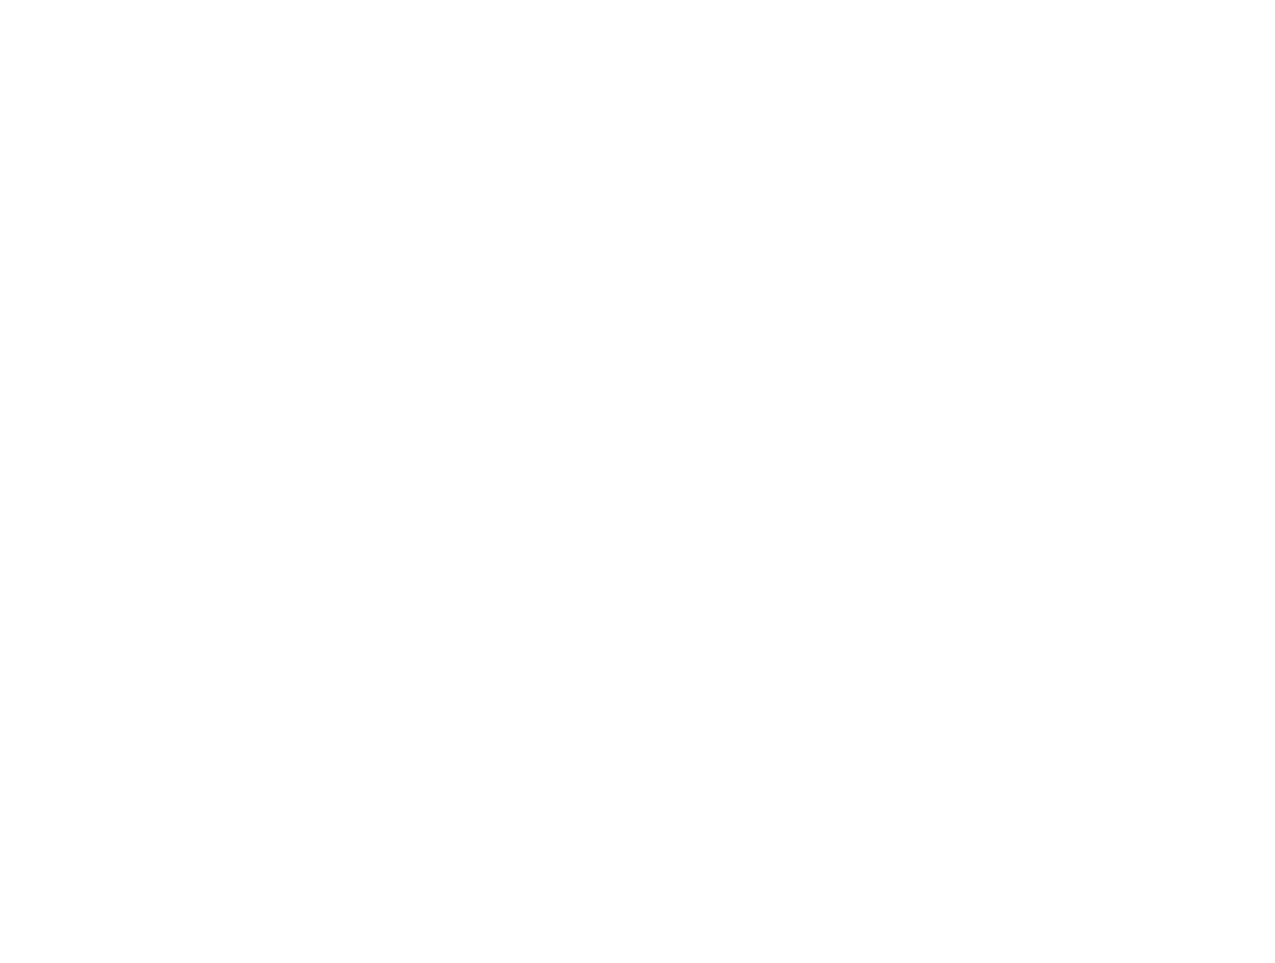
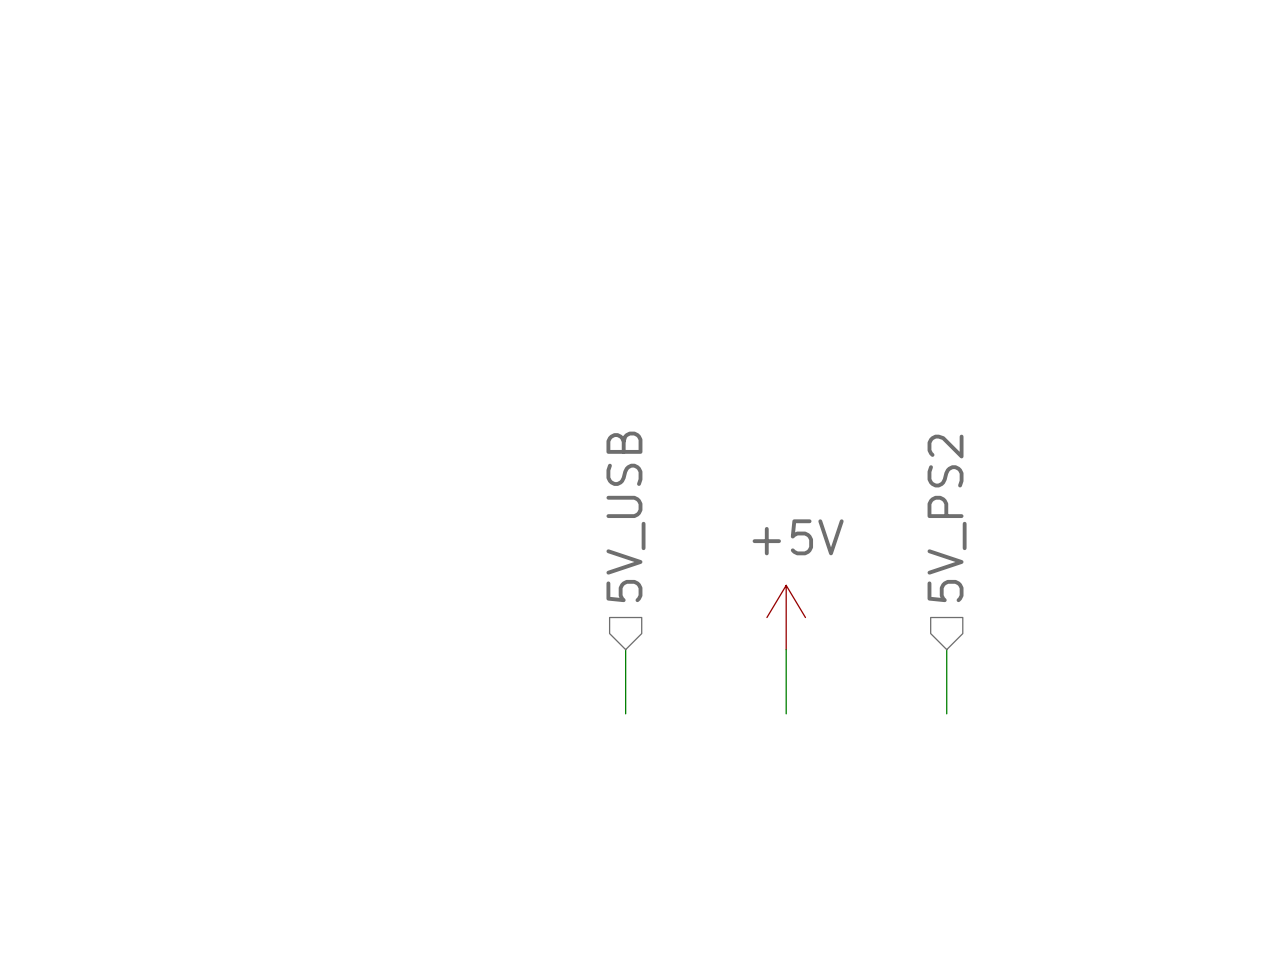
hierarchical label: none -> 5V_USB (625, 516)
hierarchical label: none -> 5V_PS2 (947, 518)
power symbol: none -> +5V (786, 617)
wire: none -> (625, 649) (625, 713)
wire: none -> (786, 649) (786, 713)
wire: none -> (946, 649) (946, 713)

